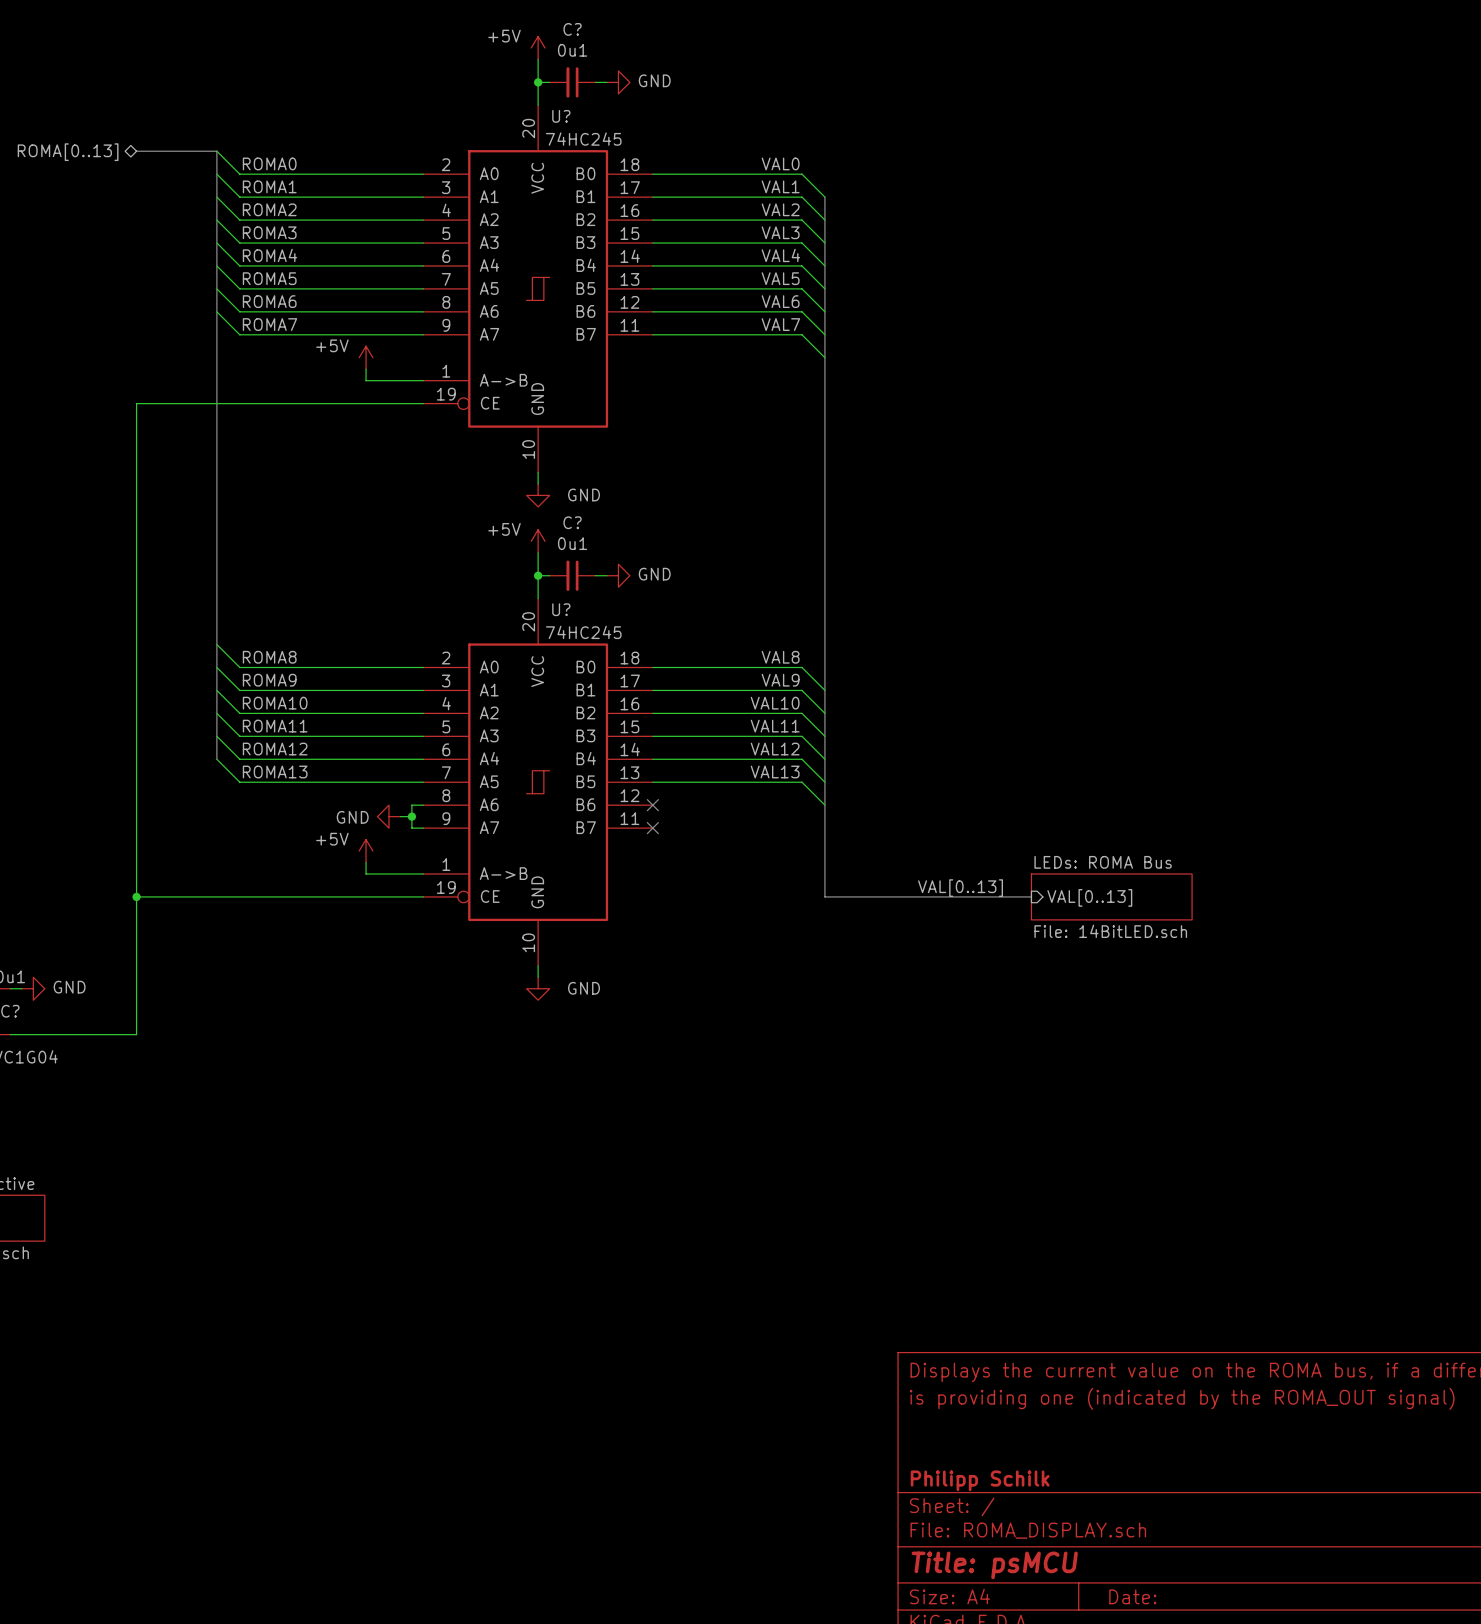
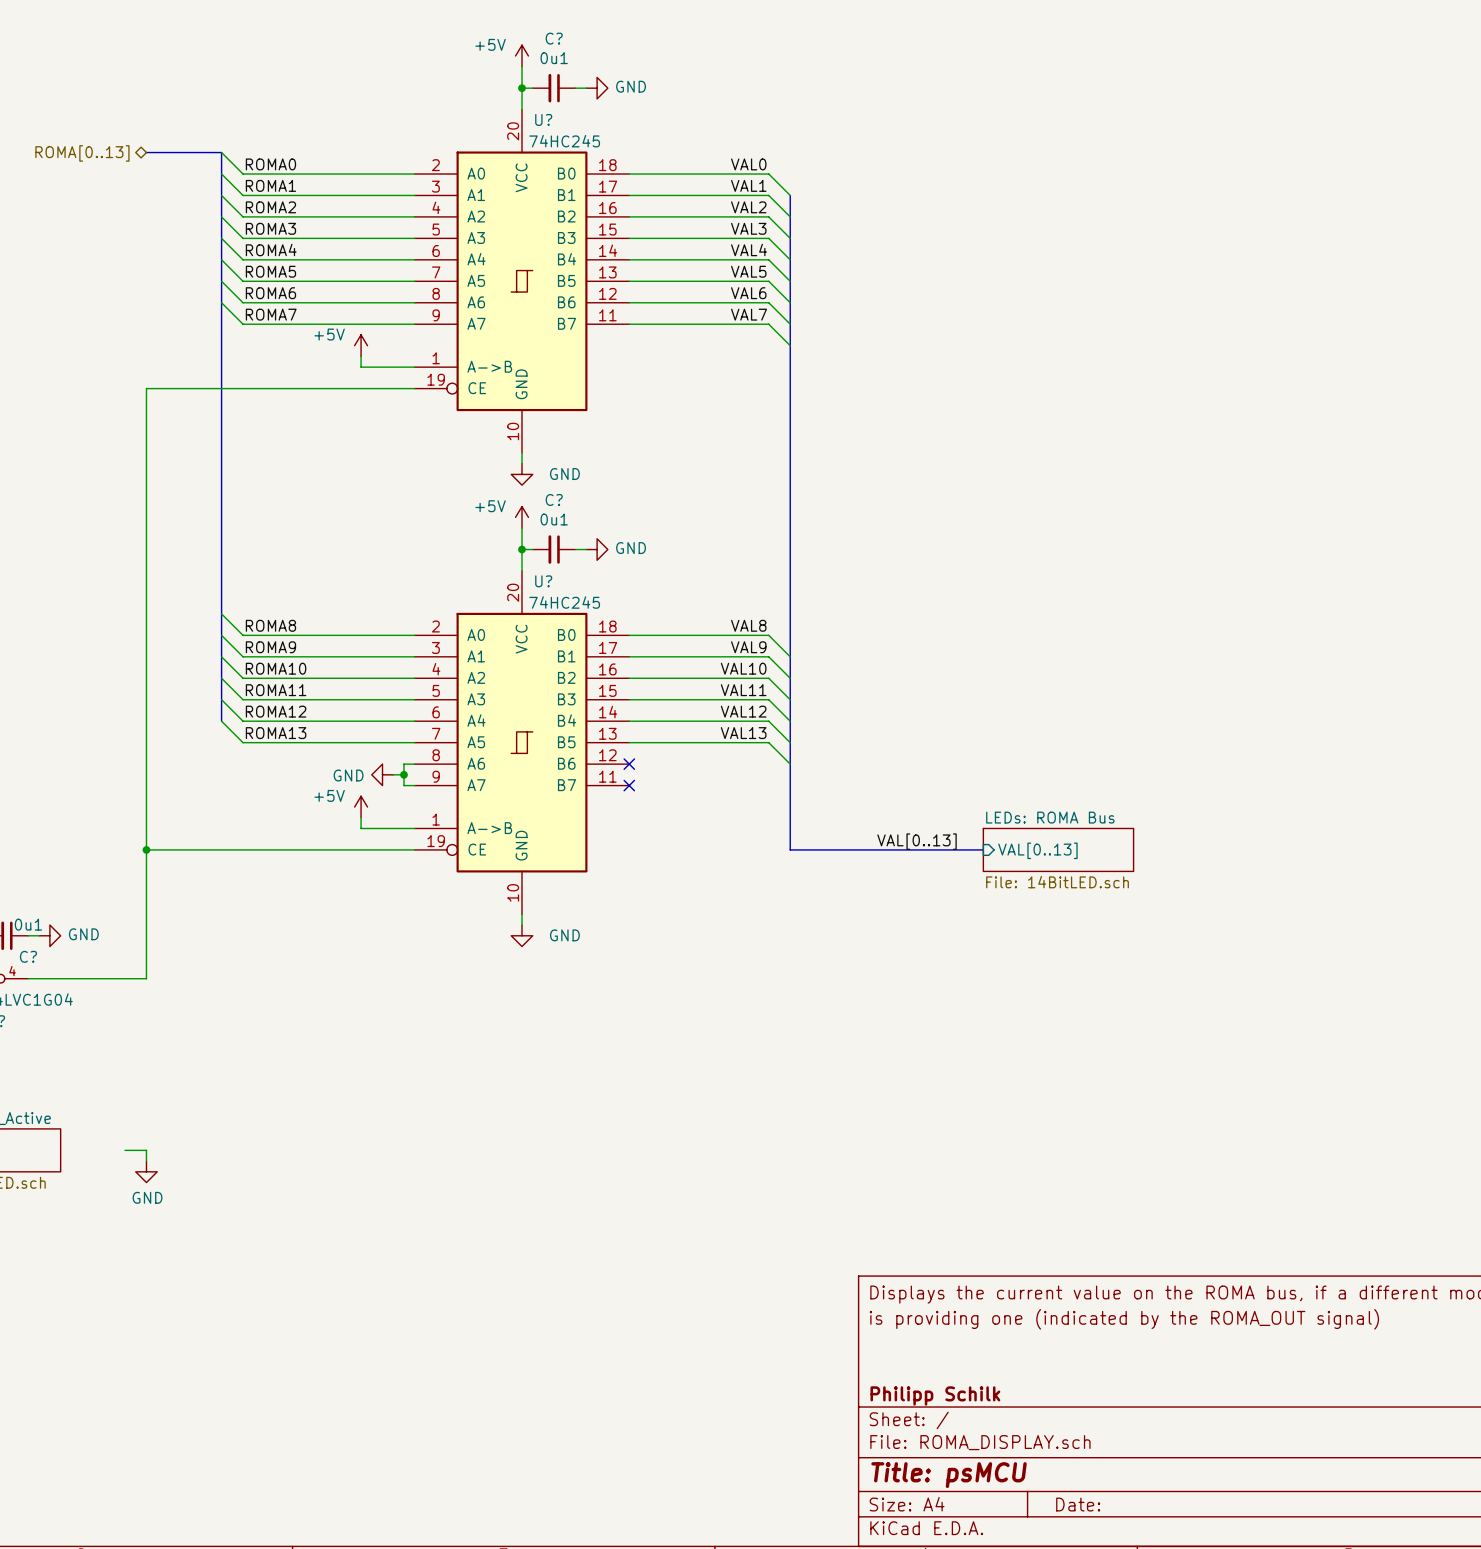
wire: none -> (125, 1150) (146, 1150) (146, 1161)
power symbol: none -> GND (146, 1171)

